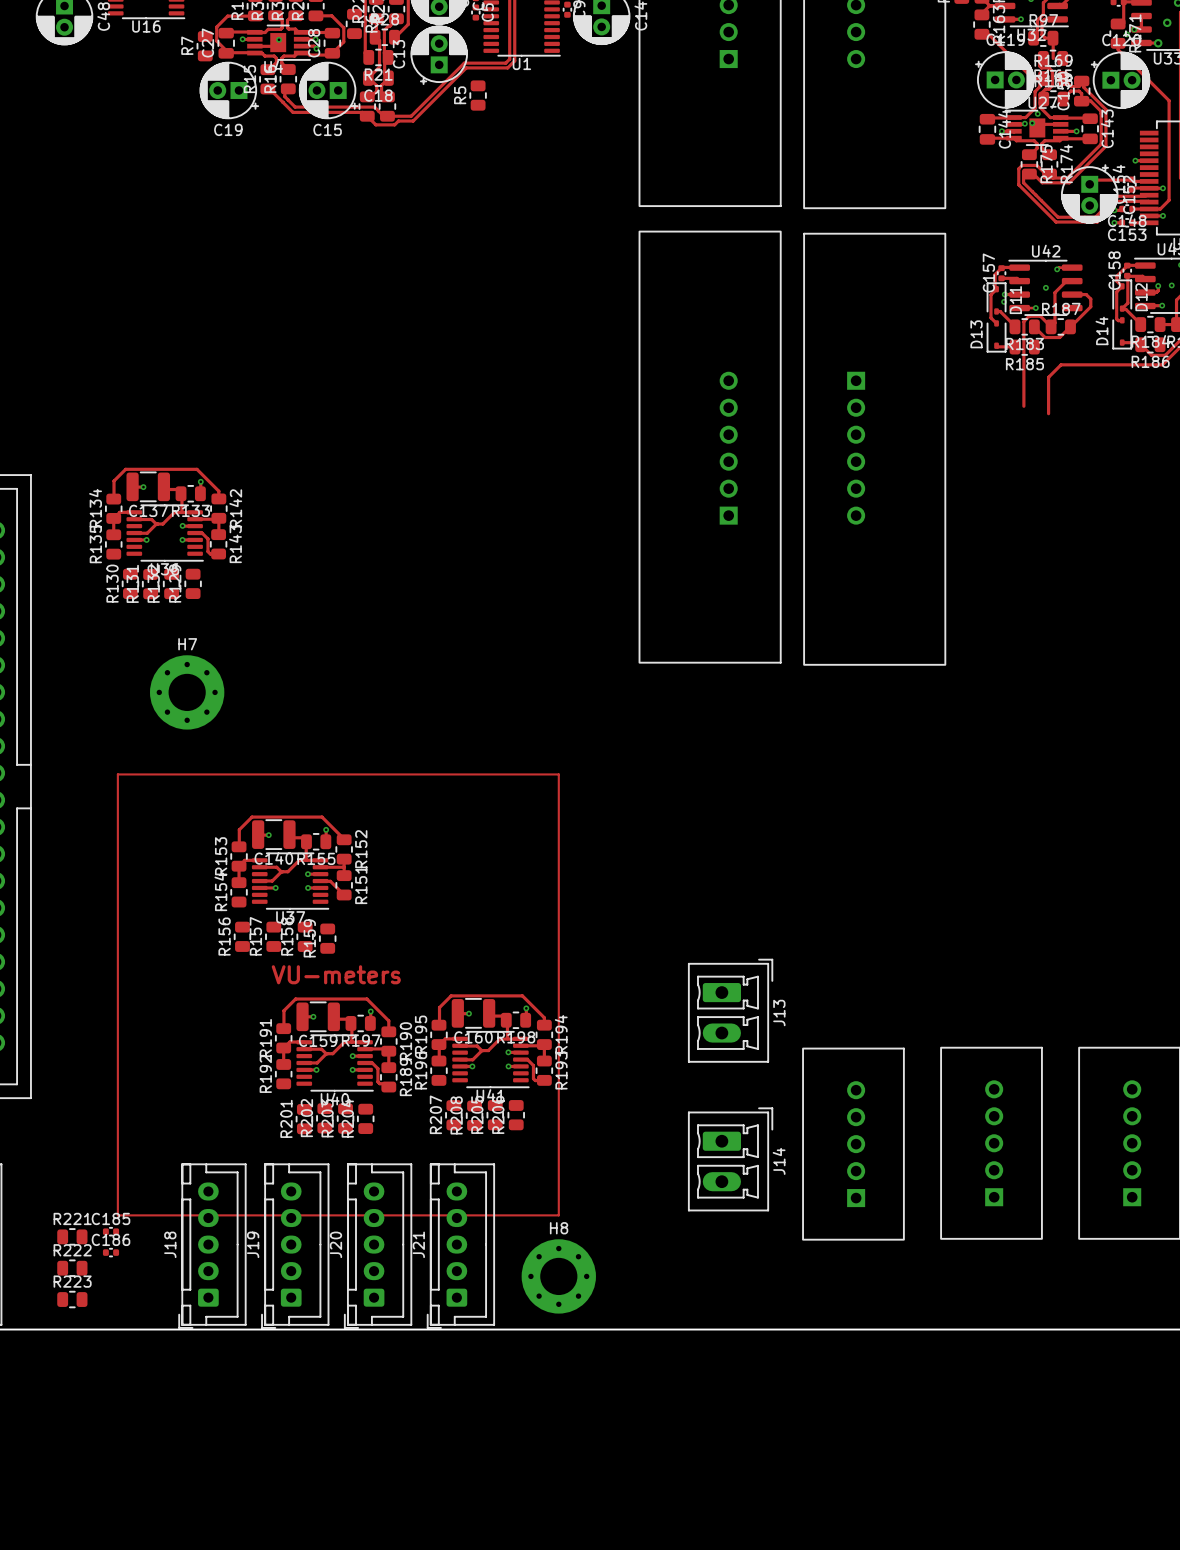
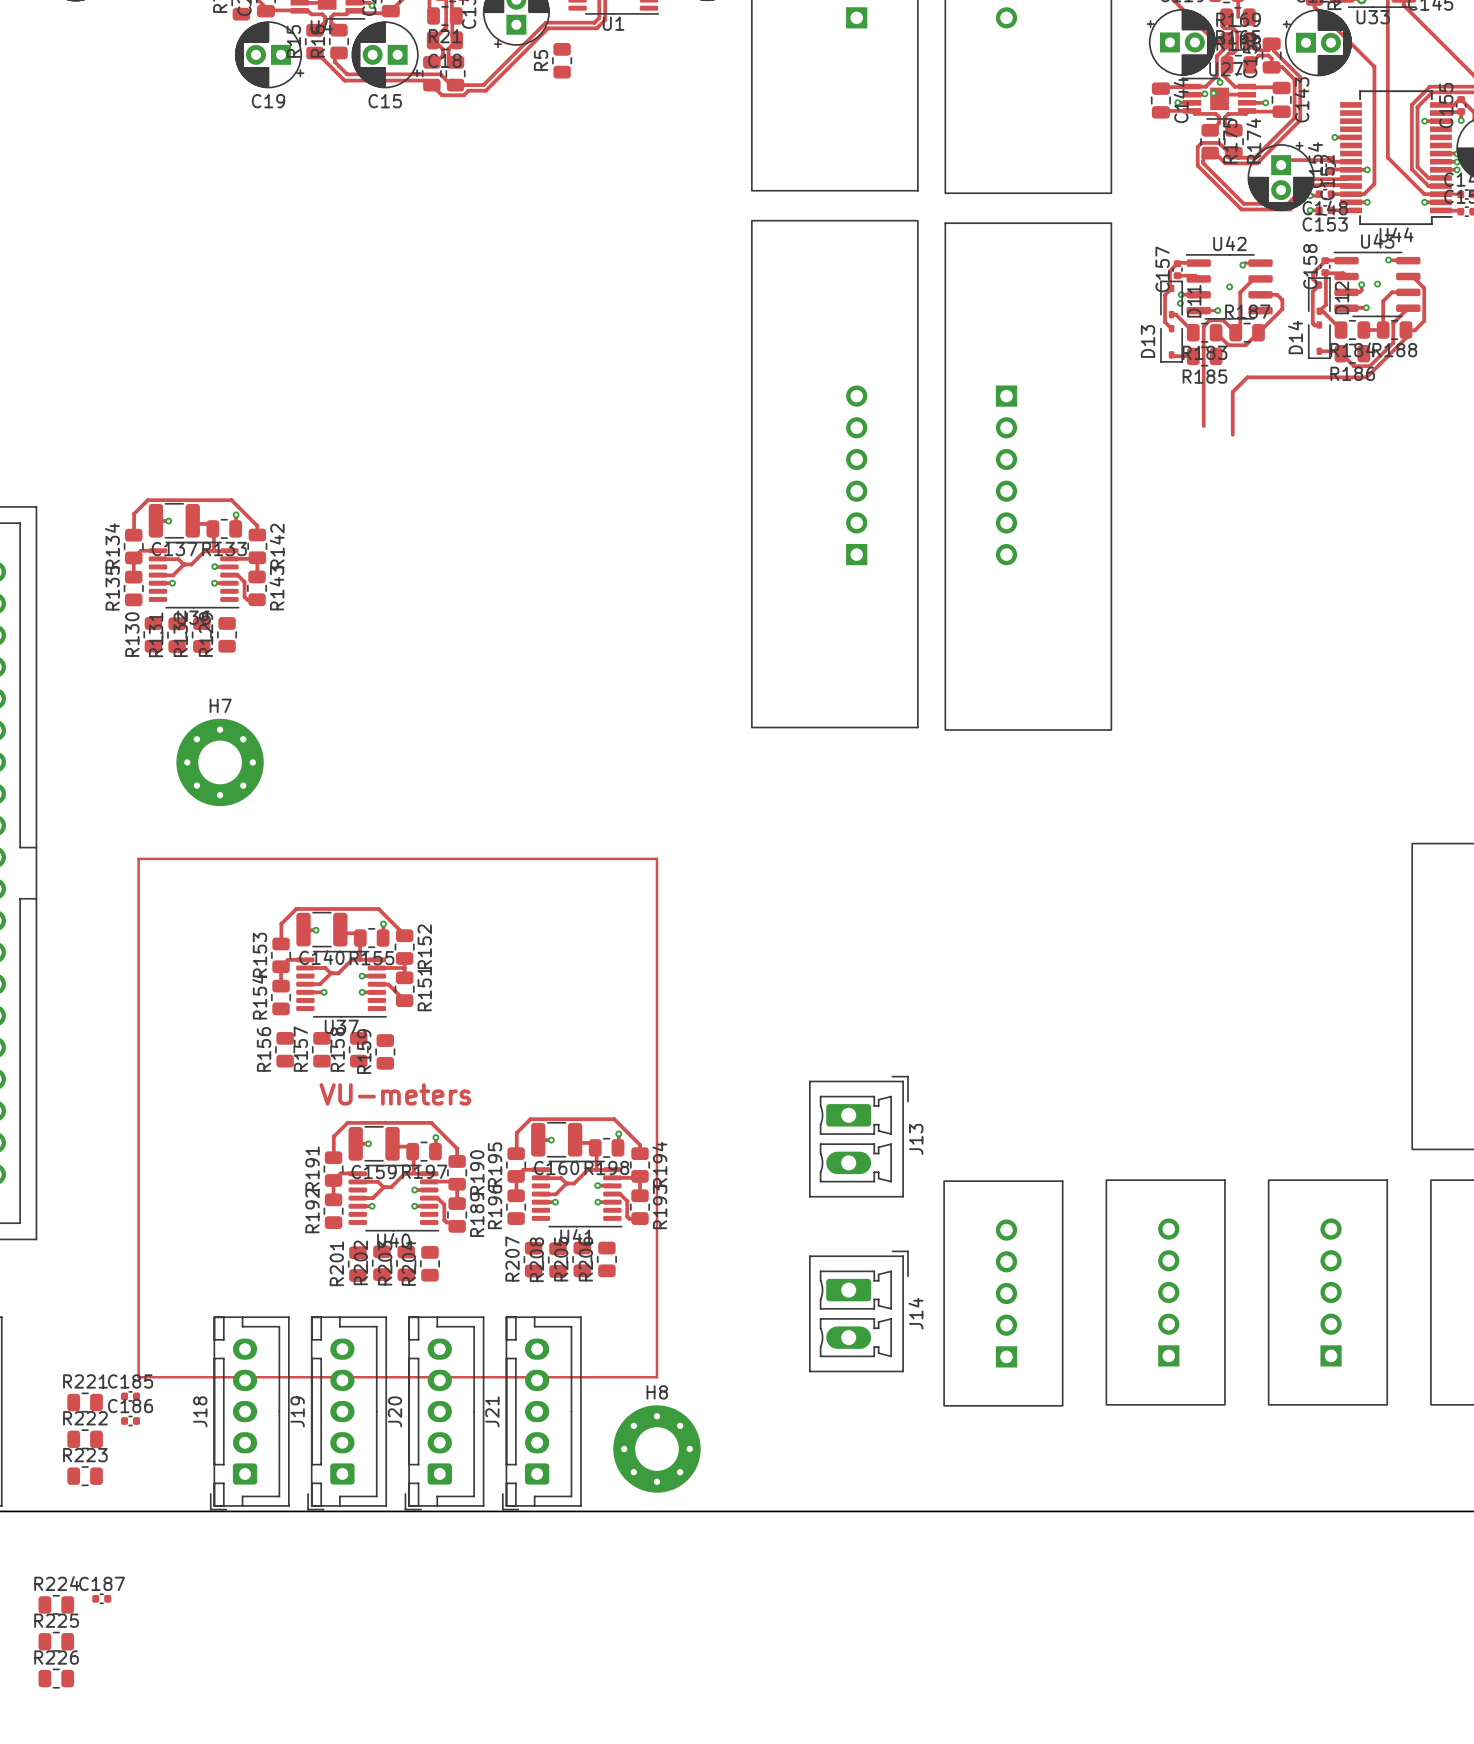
C187: none -> (101, 1598)
R224: none -> (56, 1604)
R225: none -> (56, 1641)
R226: none -> (56, 1678)

